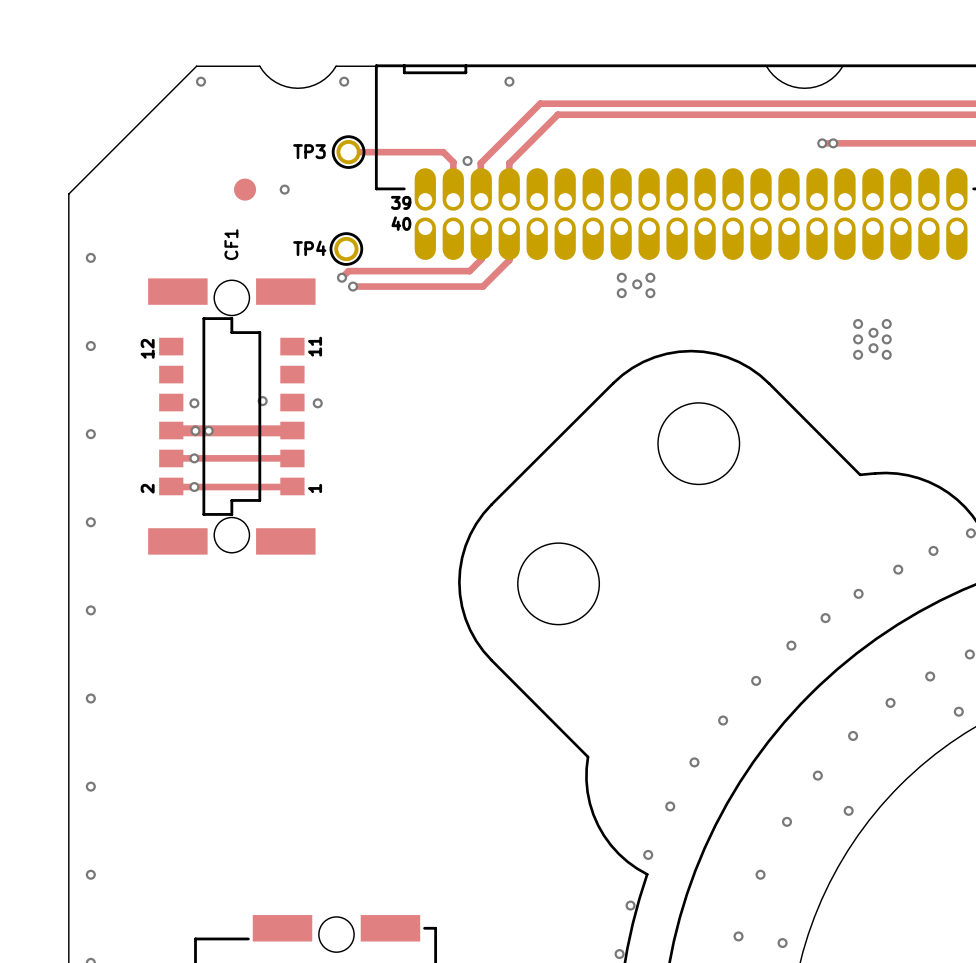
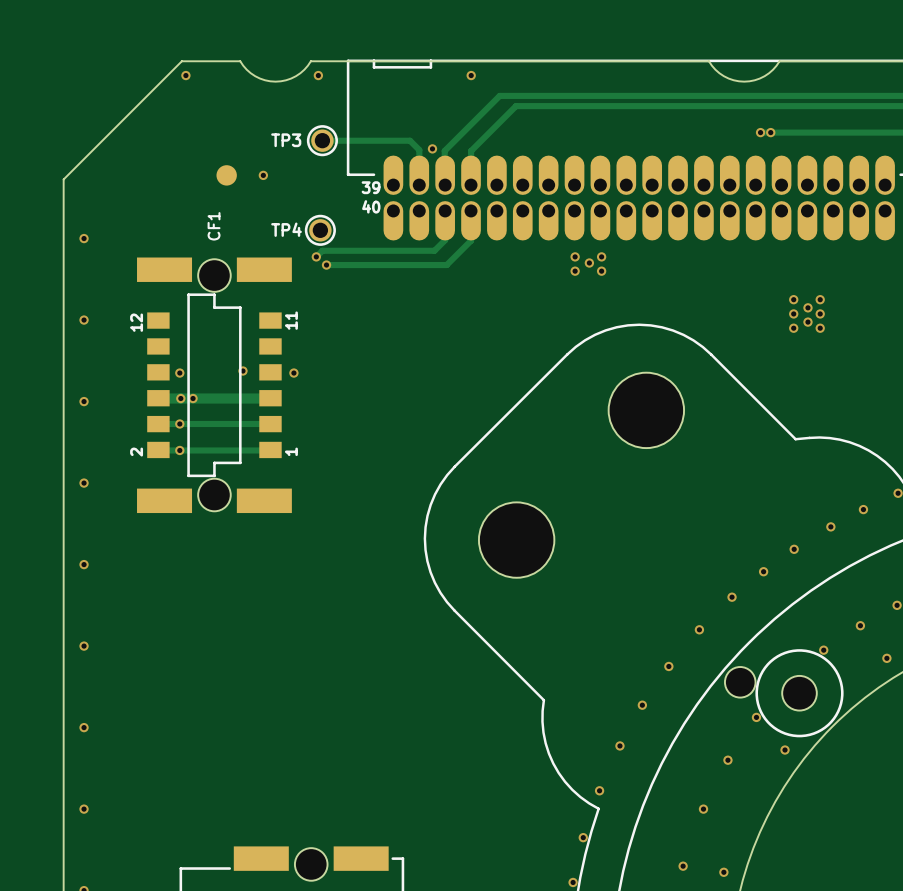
via: (853, 735) -> none
part: none -> (740, 682)
part: none -> (799, 693)

